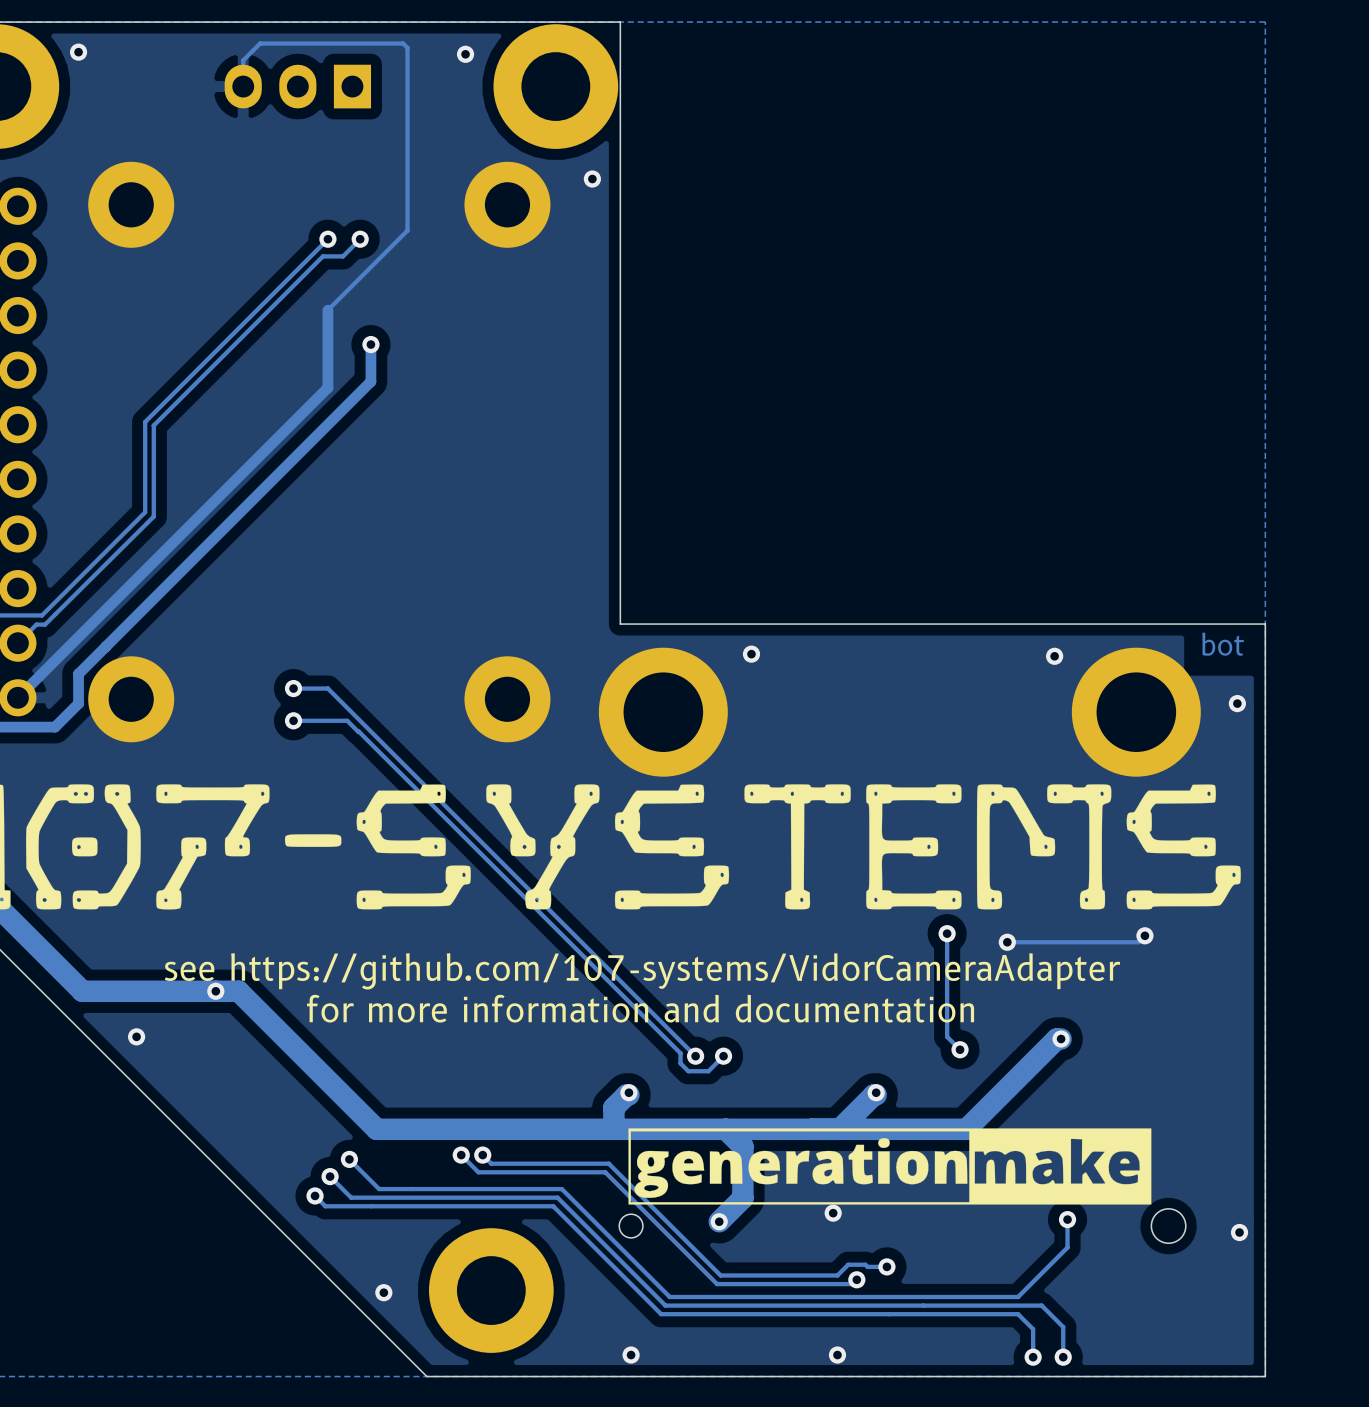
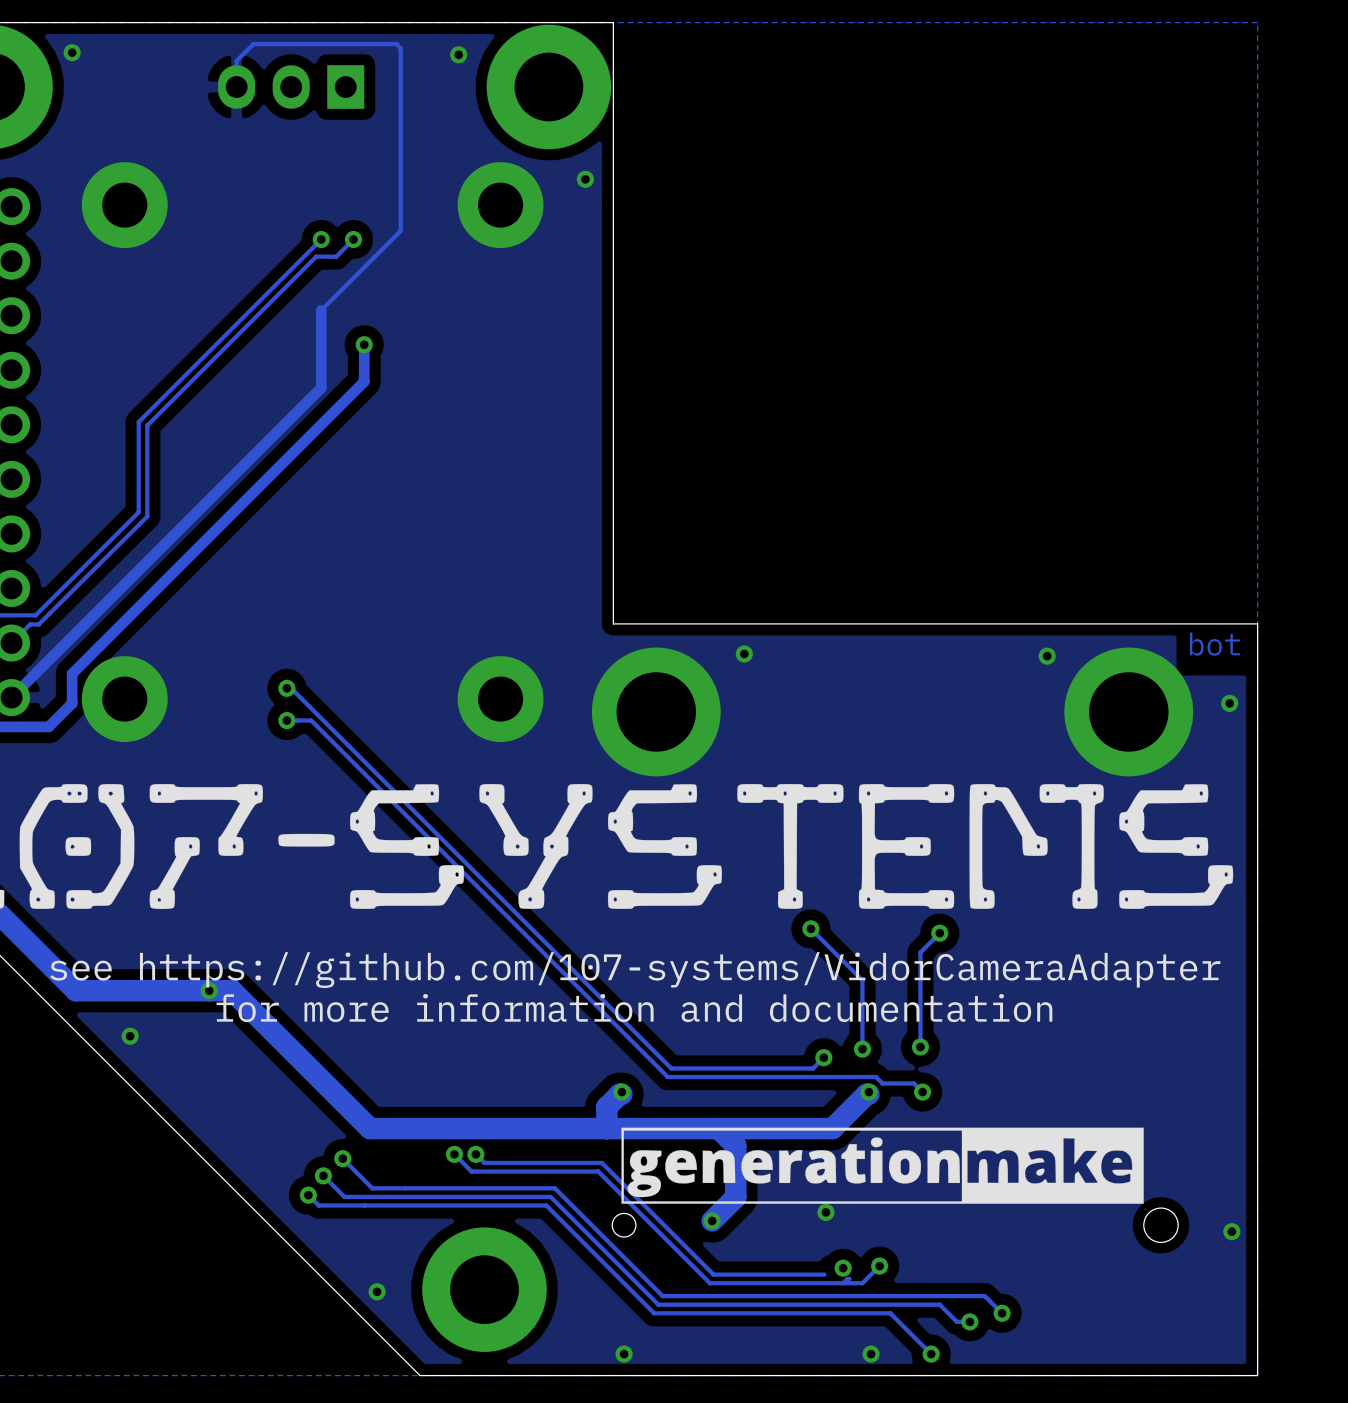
track: (293, 688) (327, 688) (695, 1056) -> none
track: none -> (291, 688) (671, 1068) (813, 1068) (823, 1057)
track: (317, 720) (347, 720) (358, 731) (680, 1053) (680, 1063) (688, 1071) (708, 1071) (723, 1056) -> (311, 720) (667, 1077) (876, 1077) (882, 1083) (914, 1083) (922, 1092)
track: none -> (810, 928) (862, 980) (862, 1049)
via: none -> (810, 928)
track: (947, 933) (947, 1036) (960, 1049) -> (939, 933) (920, 952) (920, 1046)
track: (1144, 935) (1138, 942) (1007, 942) -> none
via: (1144, 935) -> none
via: (1007, 942) -> none
track: (1061, 1038) (1056, 1038) (966, 1129) (839, 1129) -> none
via: (1061, 1038) -> none
via: none -> (920, 1046)
via: none -> (862, 1049)
via: (960, 1049) -> none
via: (695, 1056) -> none
via: (723, 1056) -> none
via: none -> (823, 1057)
via: none -> (922, 1092)
track: (1067, 1219) (1067, 1247) (1018, 1296) (992, 1296) -> (1002, 1313) (984, 1296)
via: (1067, 1219) -> none
track: (886, 1266) (848, 1264) (837, 1275) (831, 1275) -> (879, 1266) (862, 1283) (843, 1283)
via position: (856, 1279) -> (843, 1268)
track: (947, 1305) (1041, 1305) (1063, 1327) (1063, 1357) -> (939, 1304) (956, 1321) (969, 1321)
track: (897, 1314) (1018, 1314) (1033, 1329) (1033, 1357) -> (890, 1313) (931, 1354)
via: none -> (1002, 1313)
via: none -> (969, 1321)
via: (837, 1355) -> none
via: none -> (871, 1354)
via: none -> (931, 1354)
via: (1033, 1357) -> none
via: (1063, 1357) -> none

